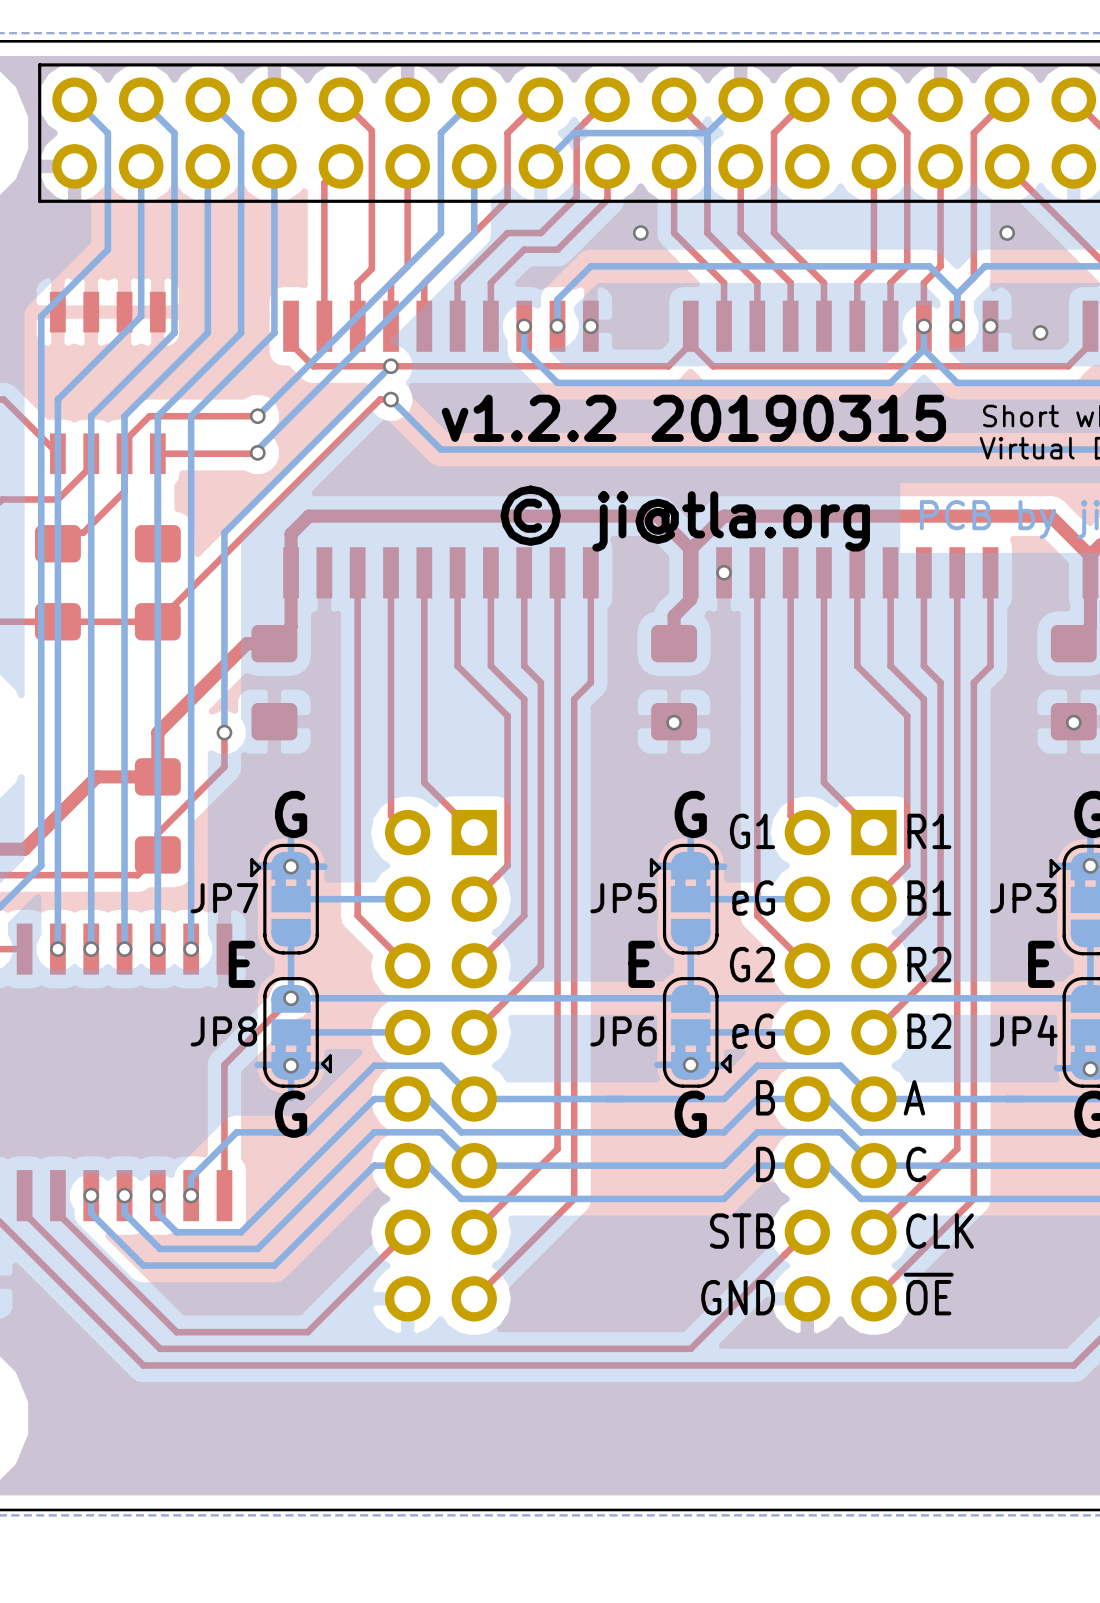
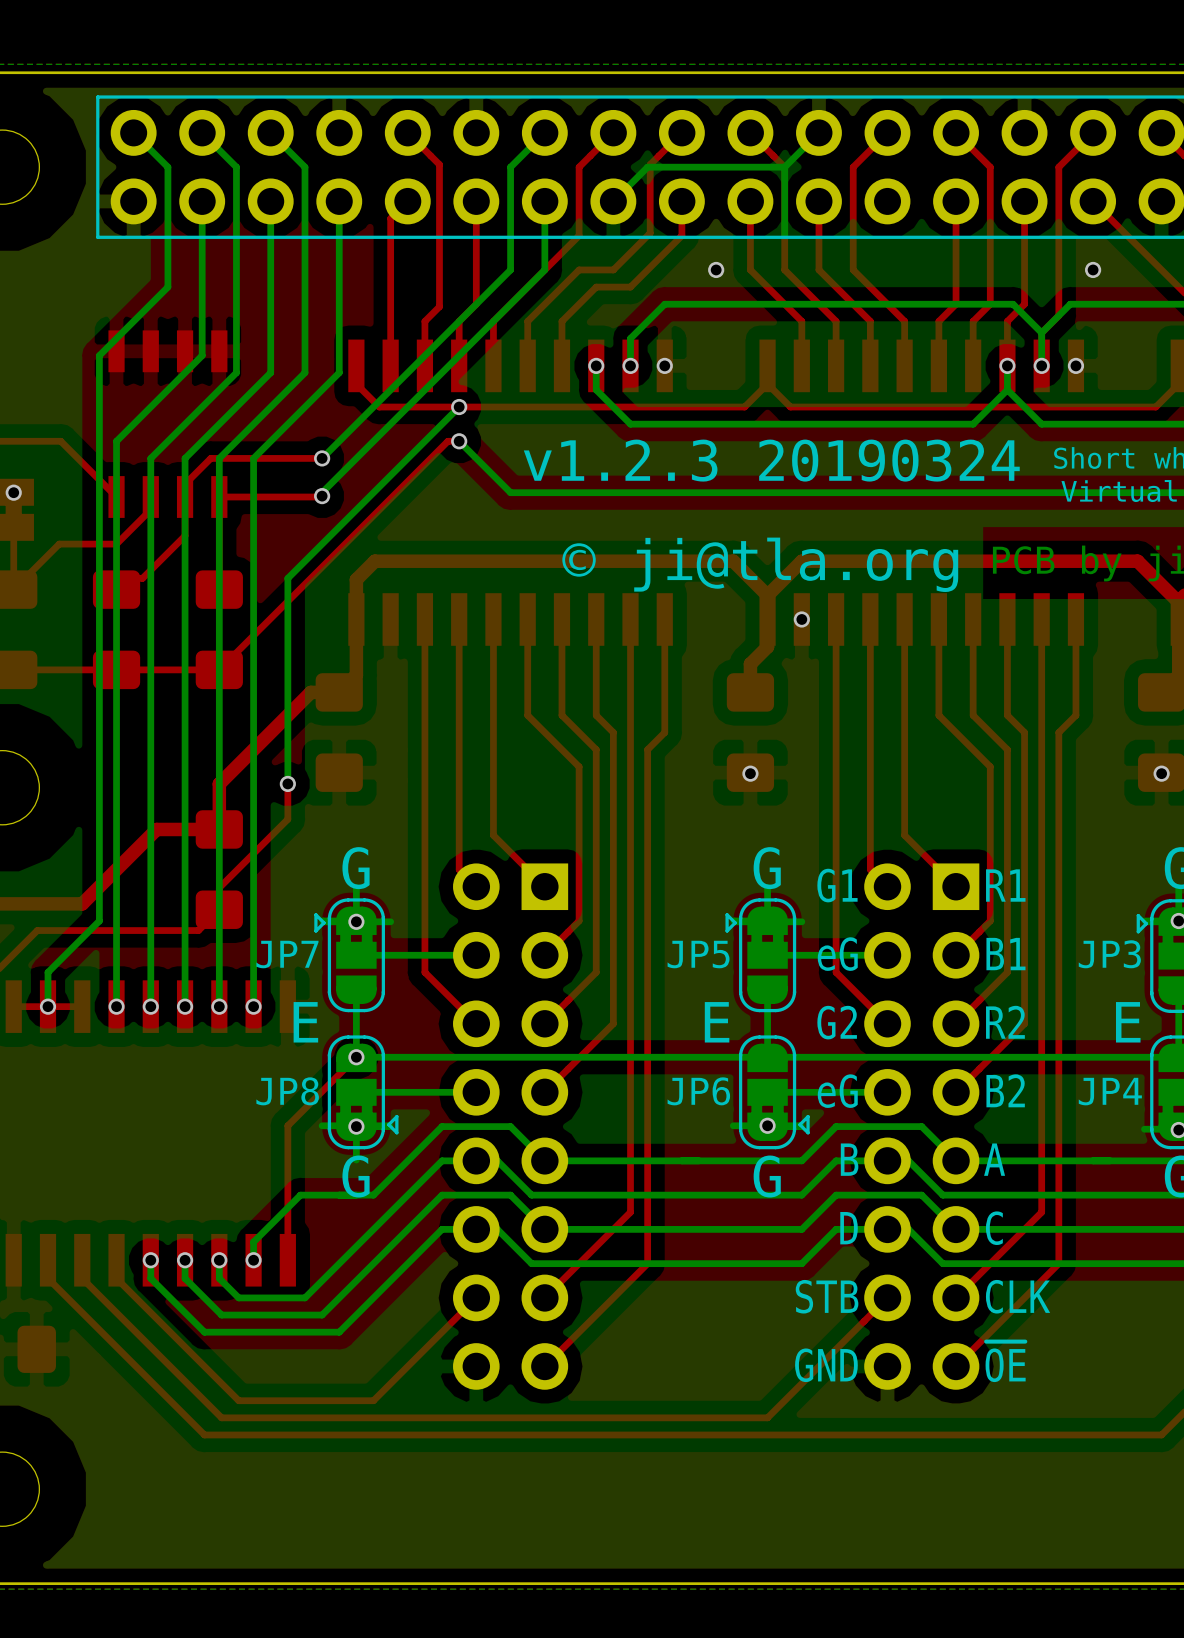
via: (1040, 332) -> none
text: v1.2.2 20190315 (693, 418) -> v1.2.3 20190324 (771, 460)

